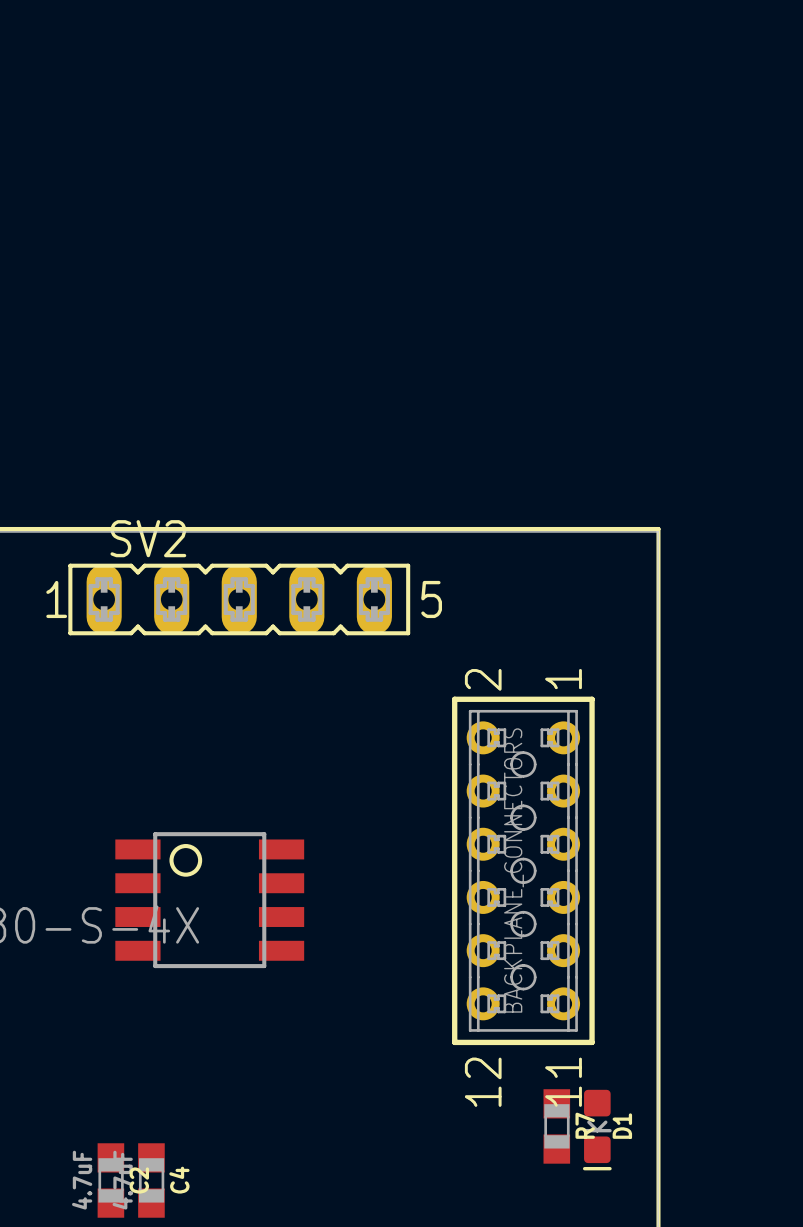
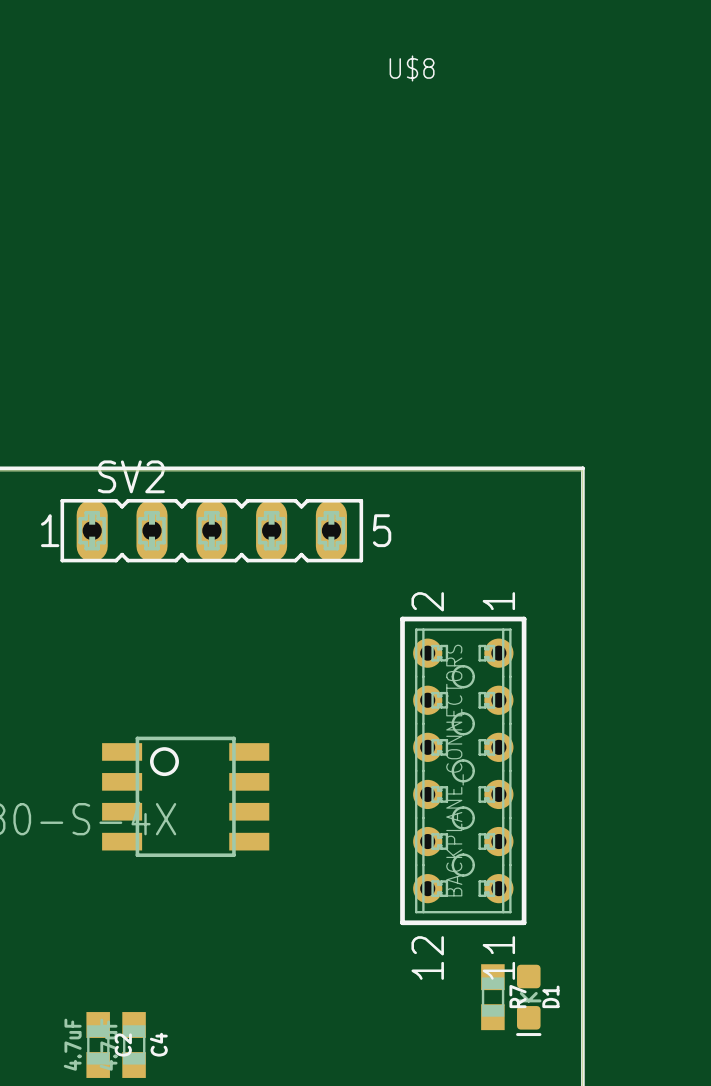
U$8 name: none -> U$8 (412, 68)

